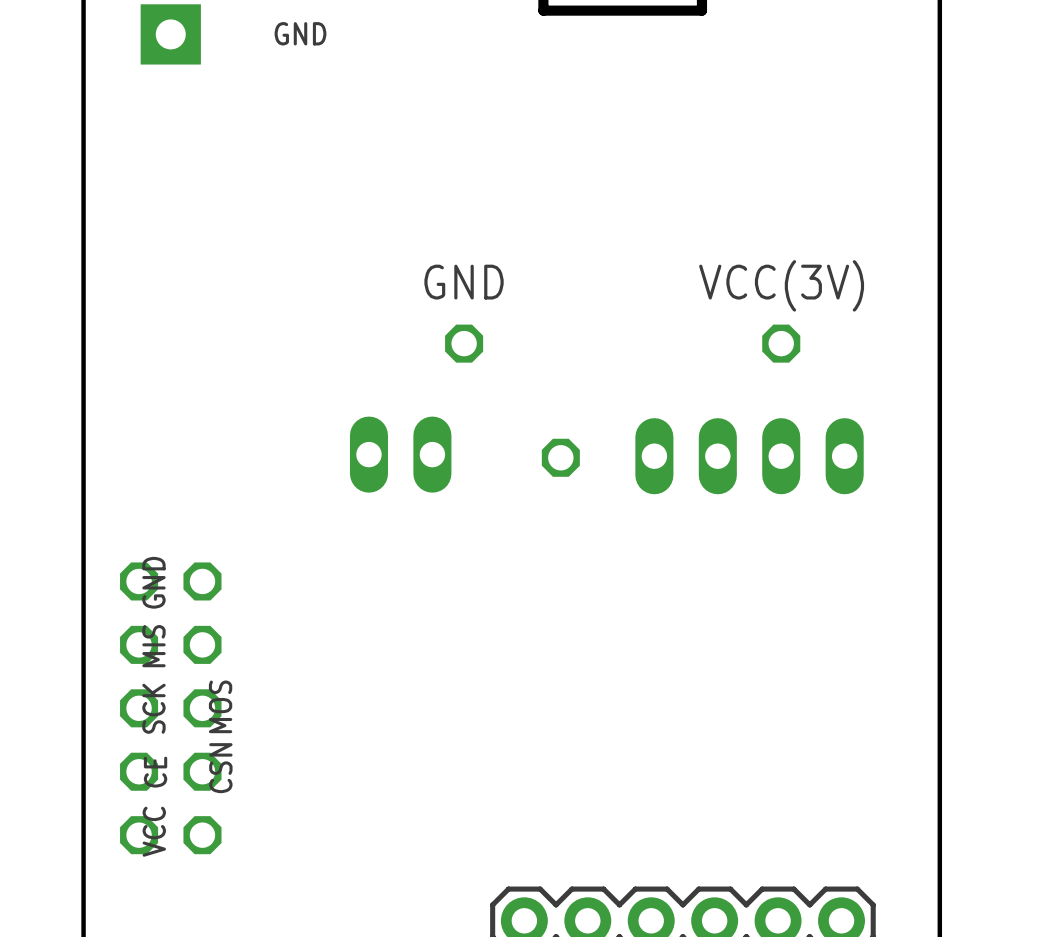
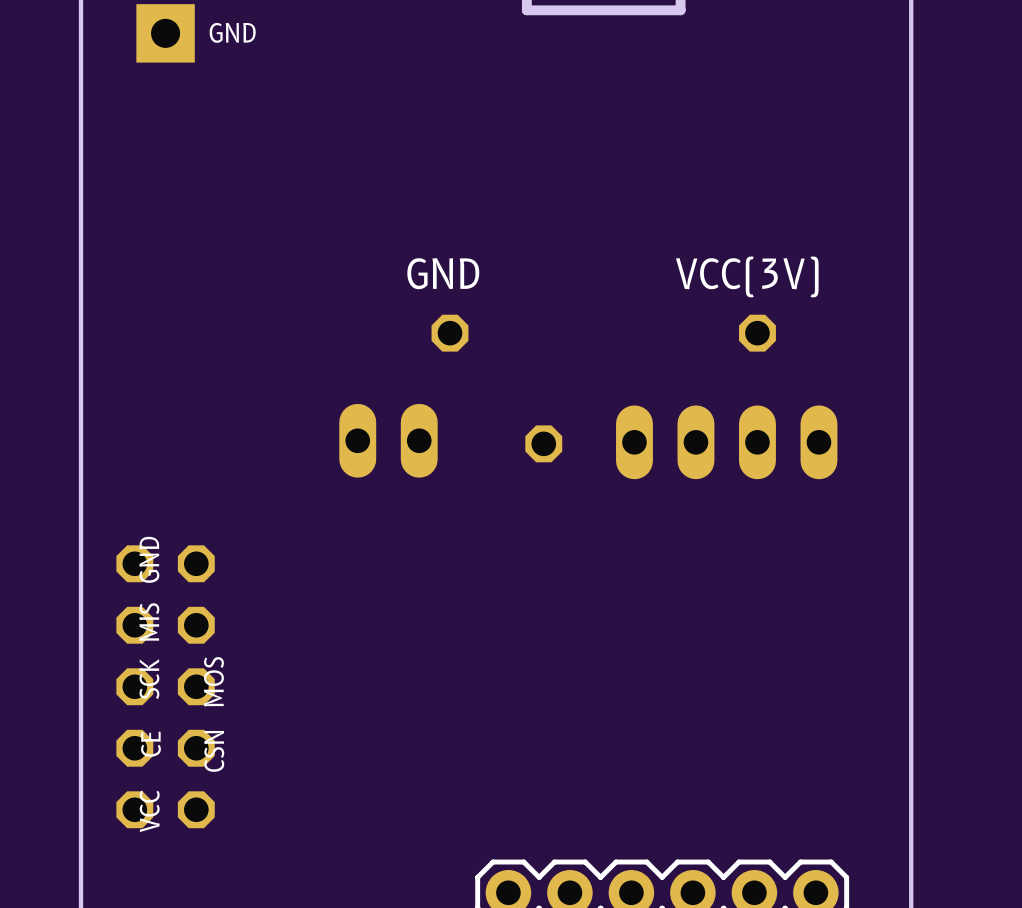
text position: GND (300, 33) -> GND (232, 32)

